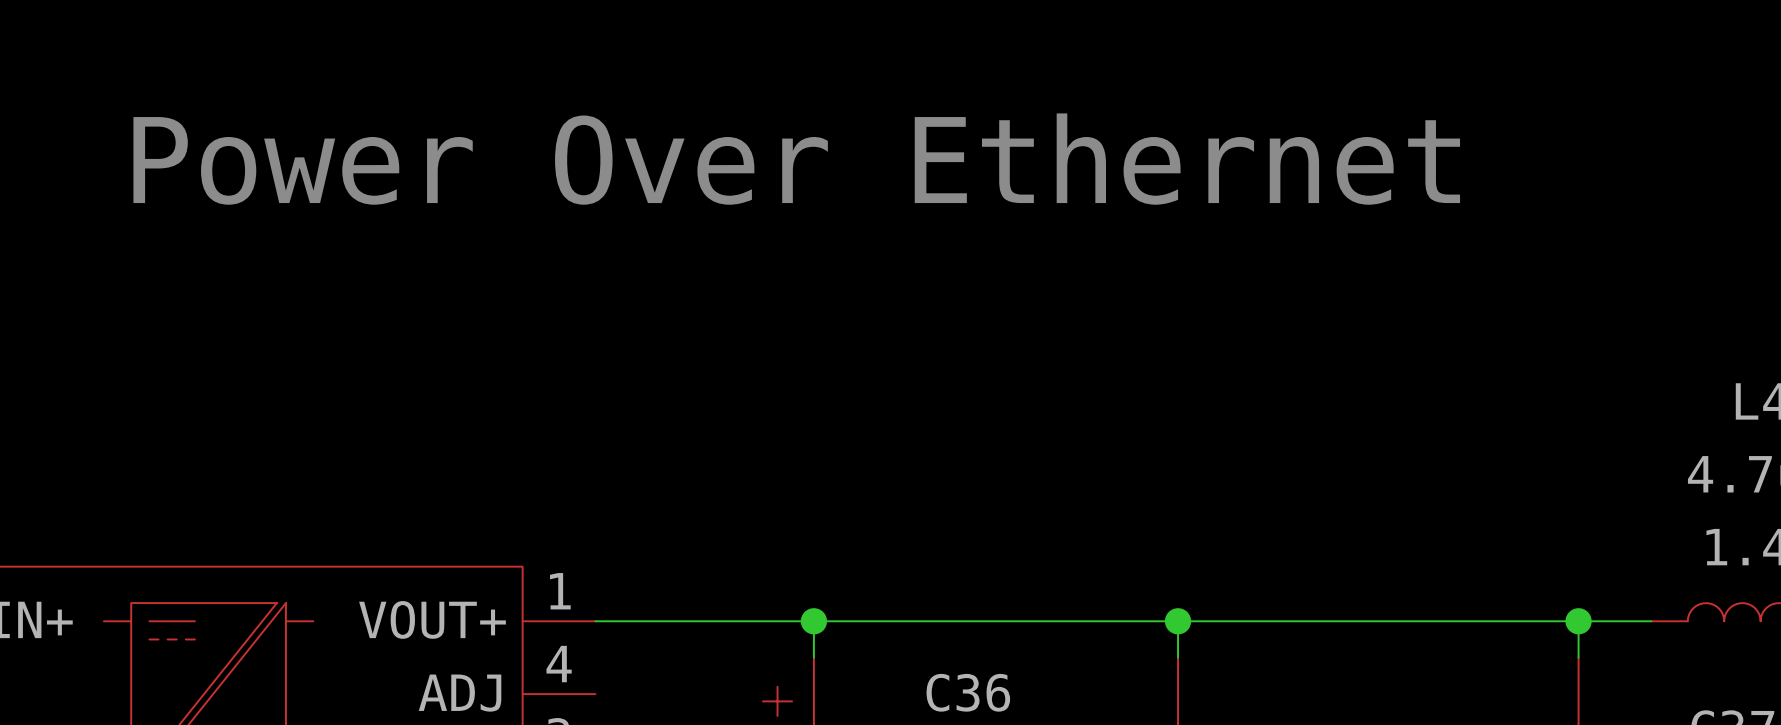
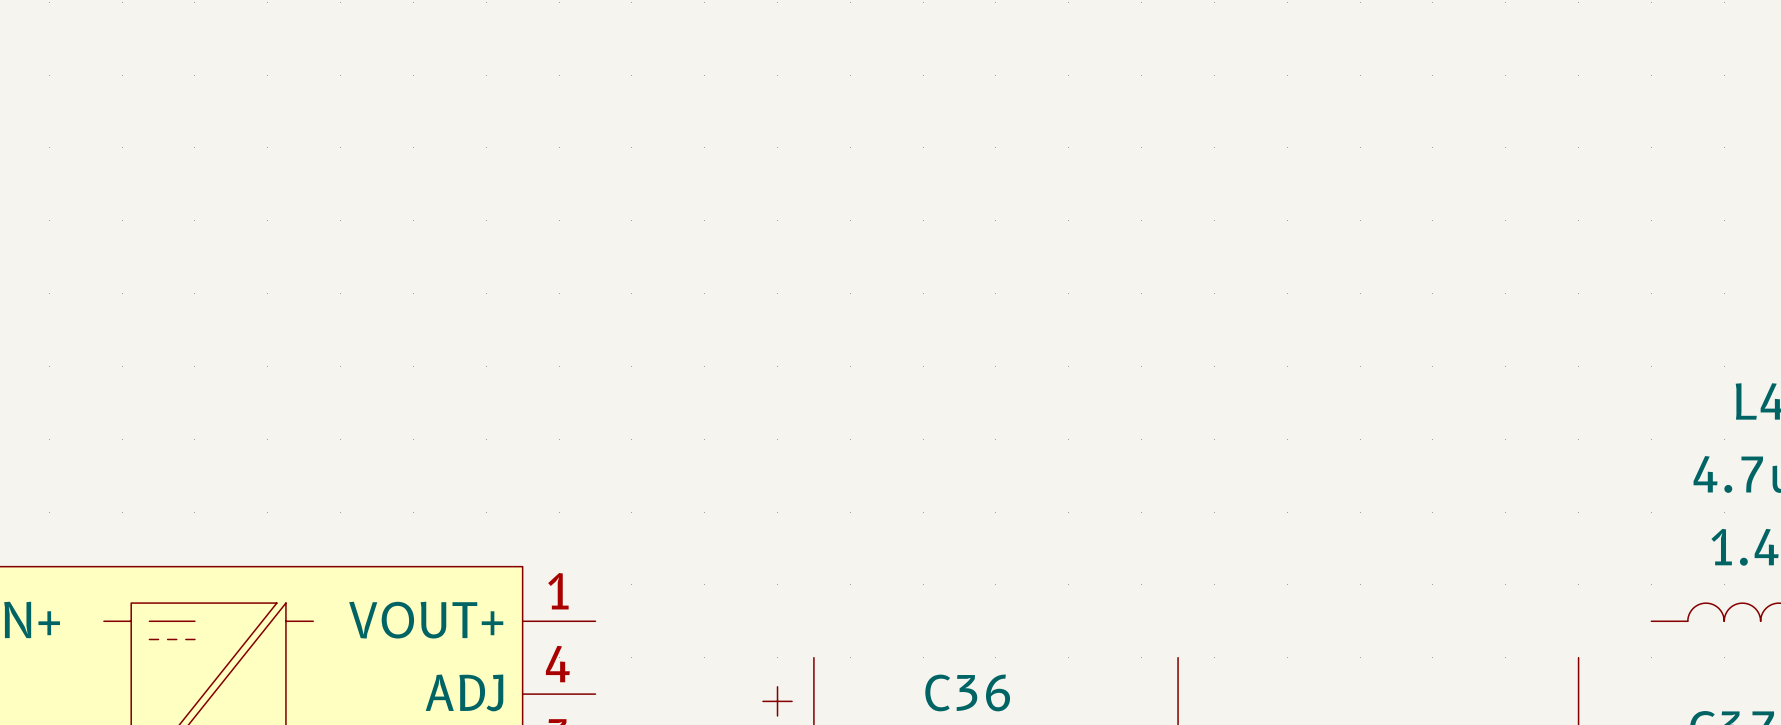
text: Power Over Ethernet (796, 159) -> none
wire: (595, 621) (1651, 621) -> none
wire: (813, 621) (813, 657) -> none
junction: (813, 621) -> none
wire: (1178, 621) (1178, 657) -> none
junction: (1178, 621) -> none
wire: (1578, 621) (1578, 657) -> none
junction: (1578, 621) -> none

